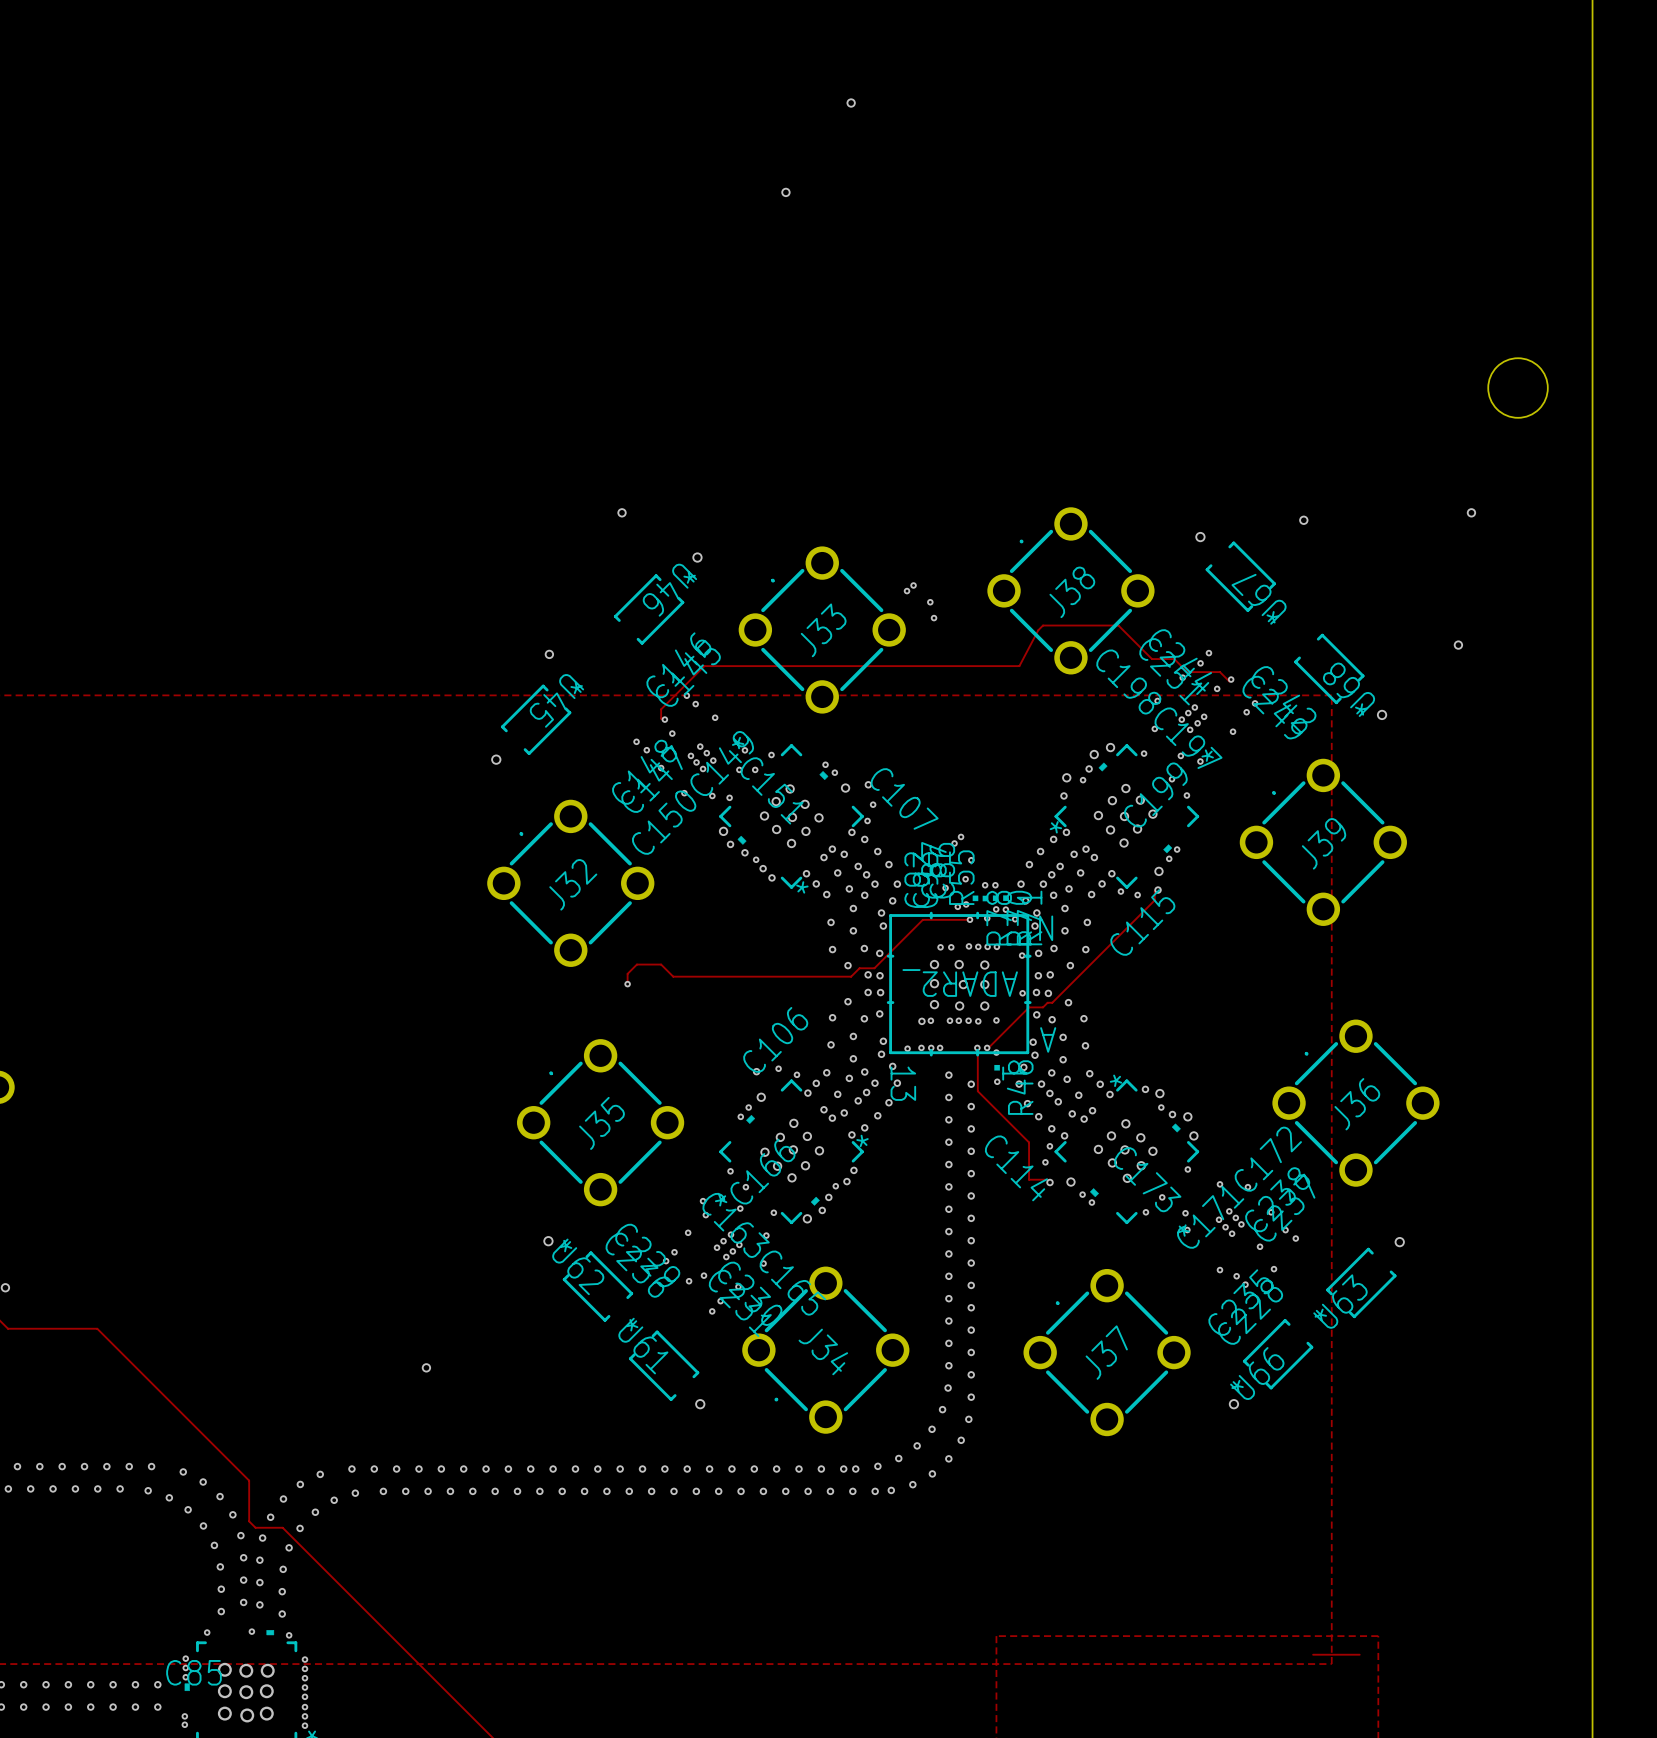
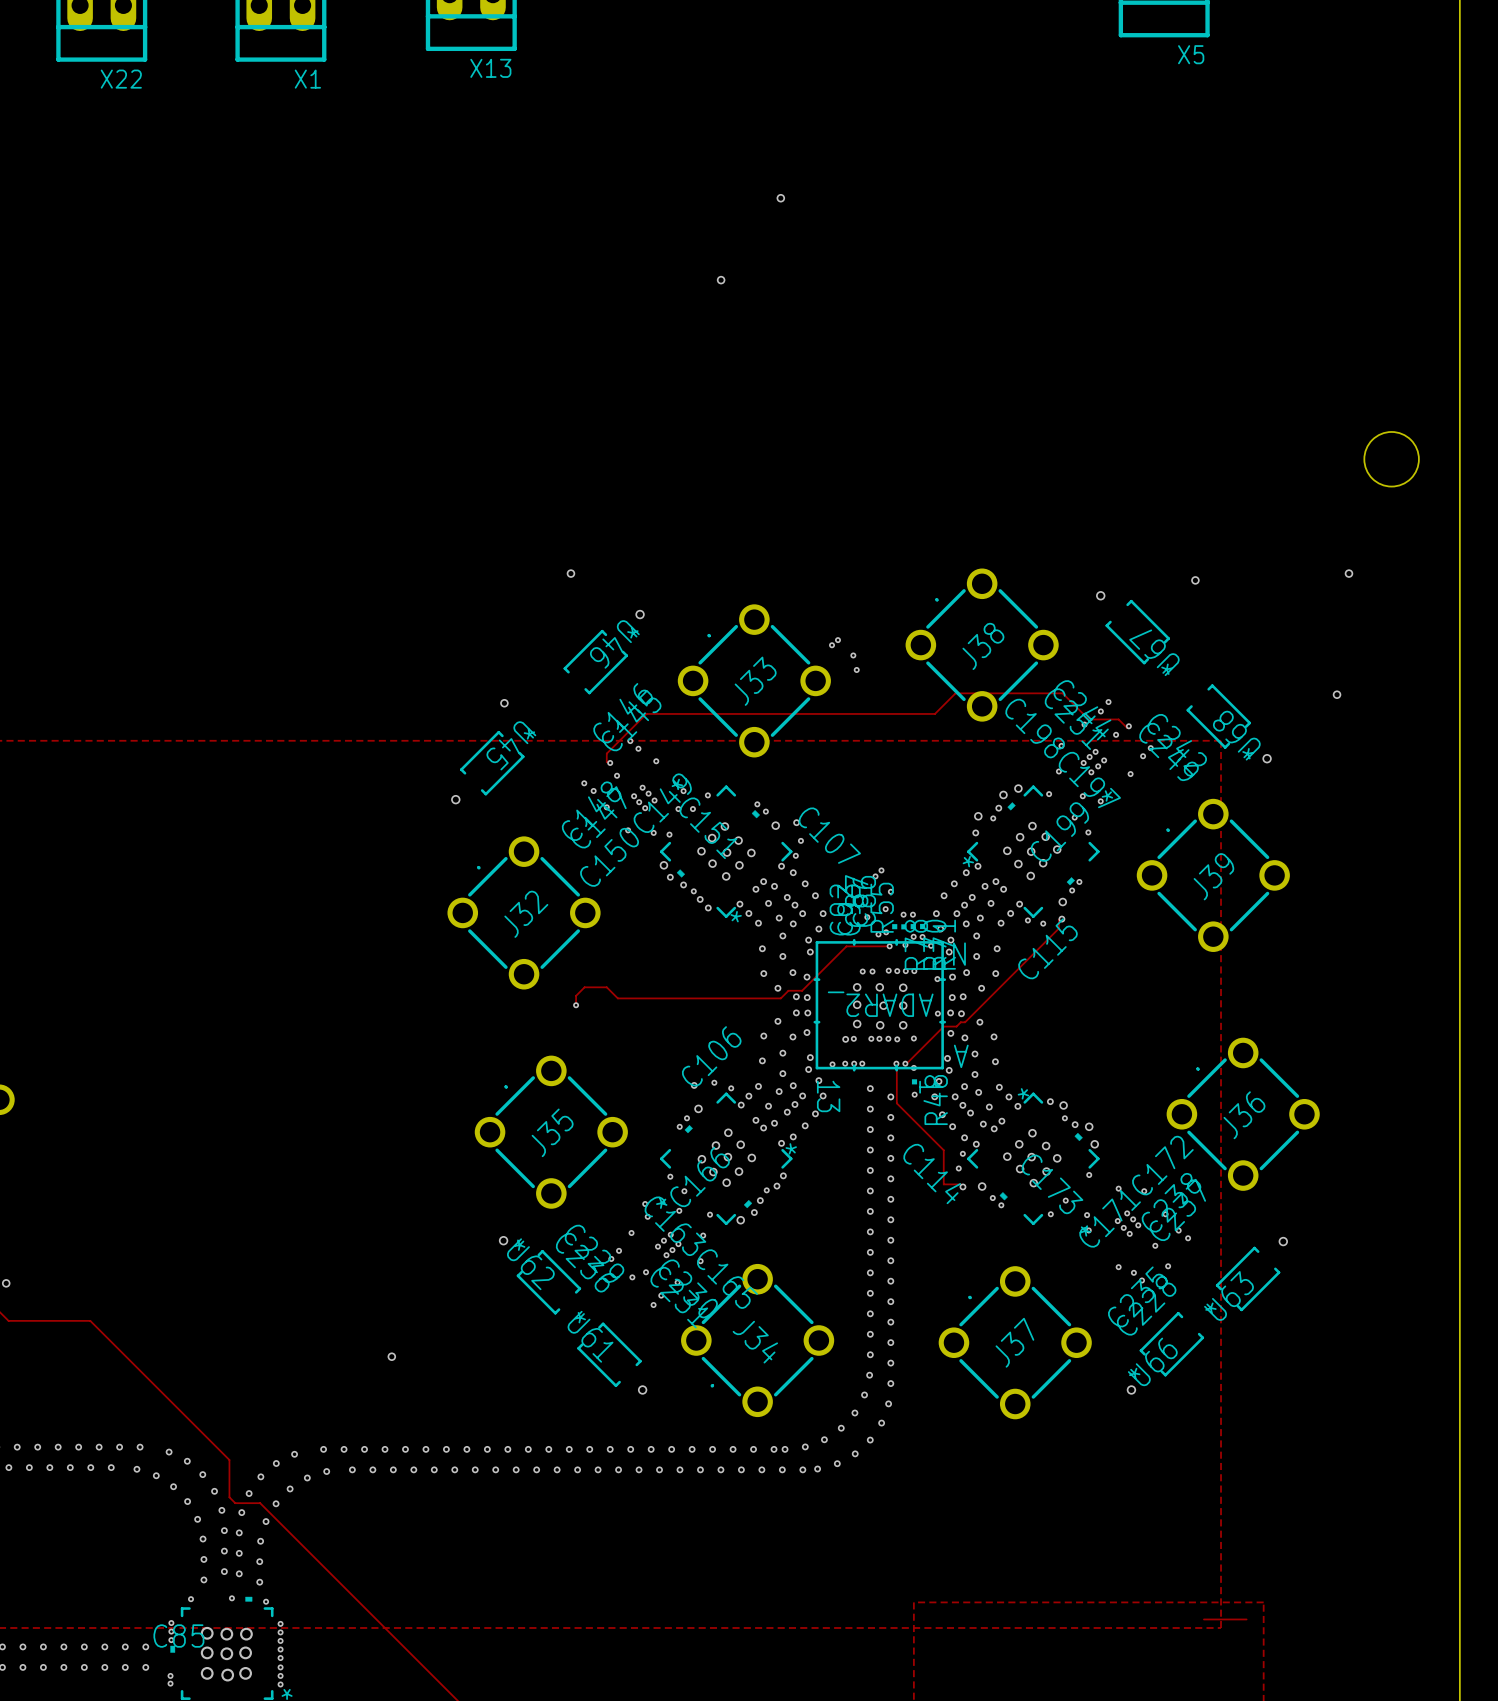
track: (1174, 659) (1151, 659) (1118, 625) (1043, 625) (1038, 630) (1019, 666) -> (1076, 707) (1062, 693) (955, 693) (934, 713)

